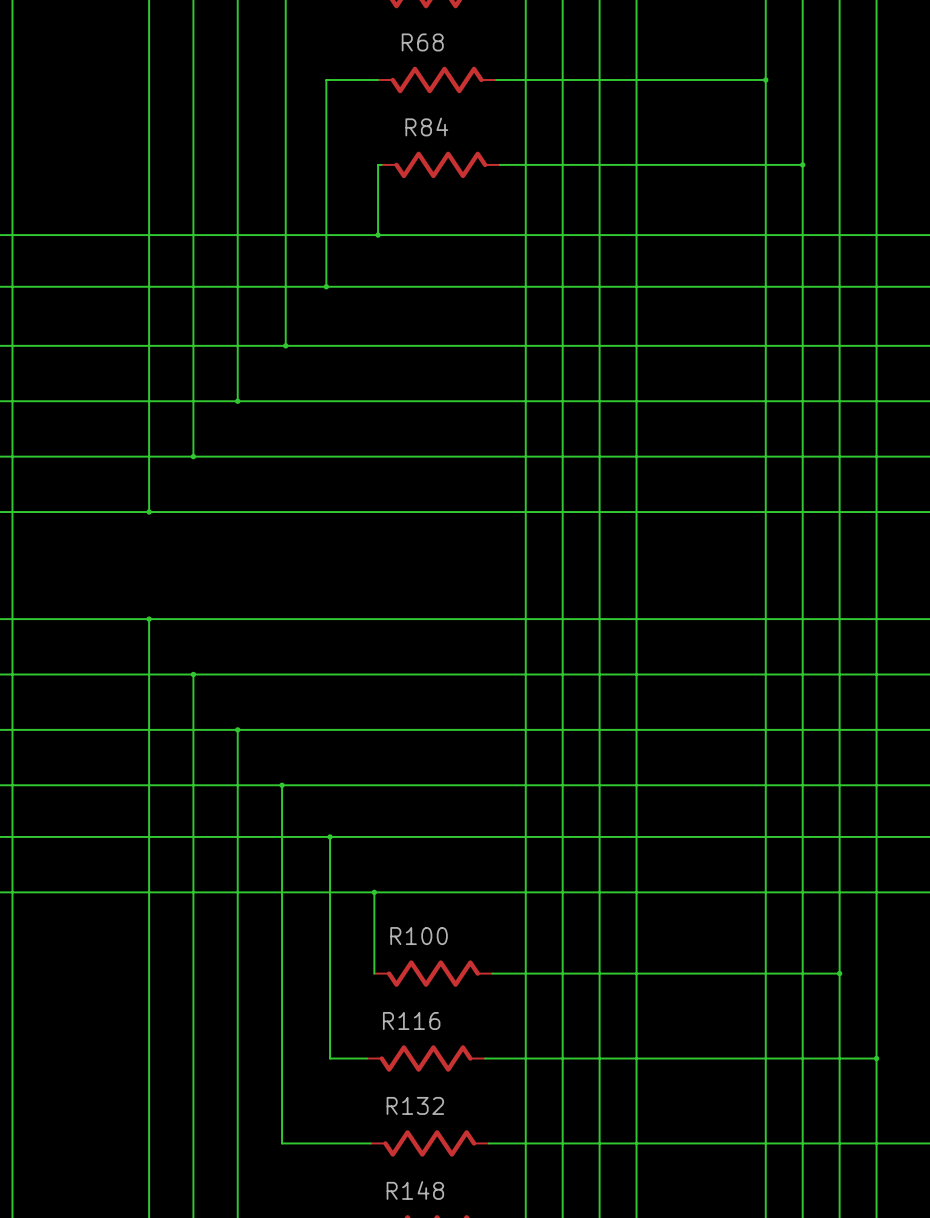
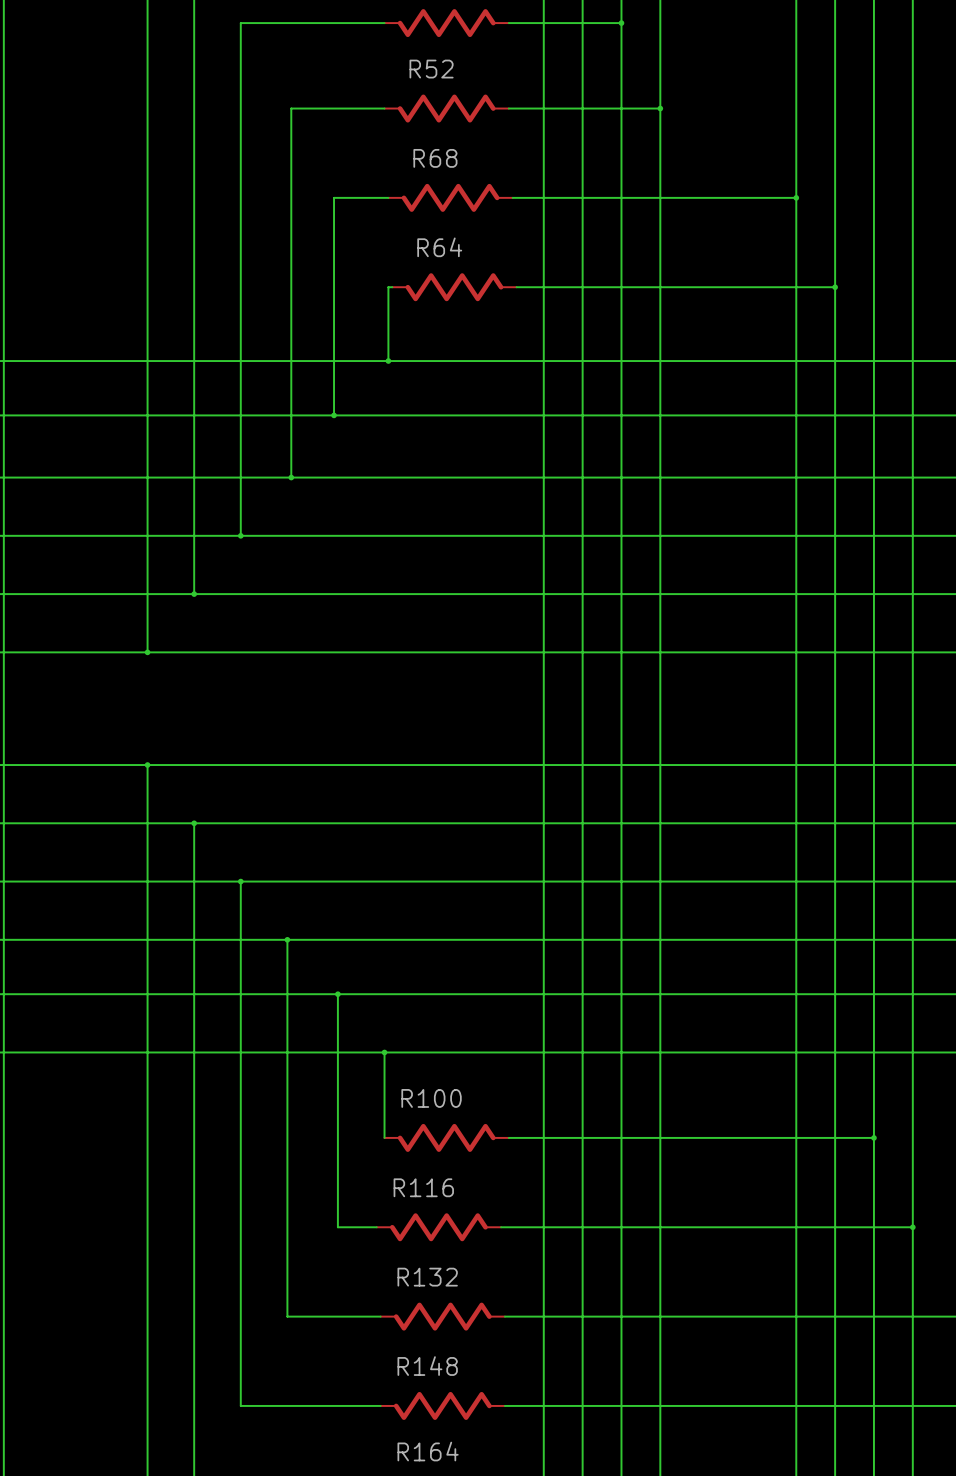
R84 name: R84 (426, 126) -> R64 (439, 247)

